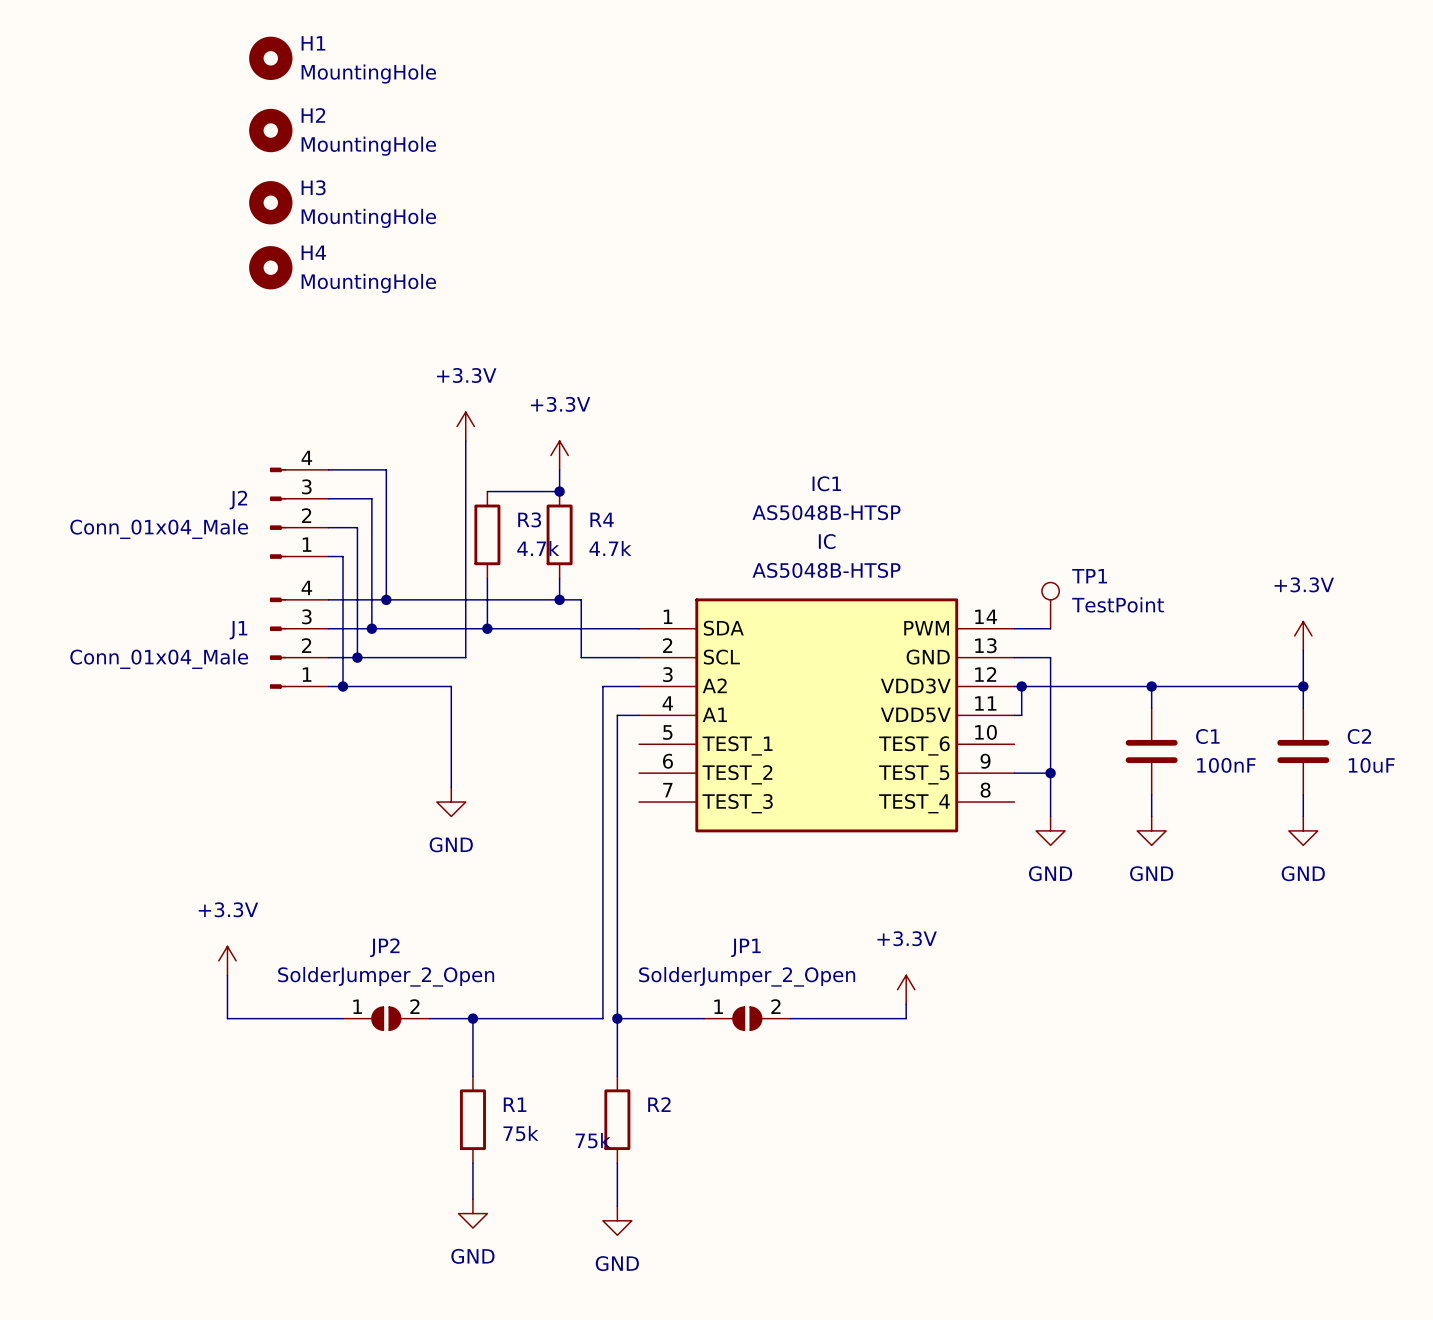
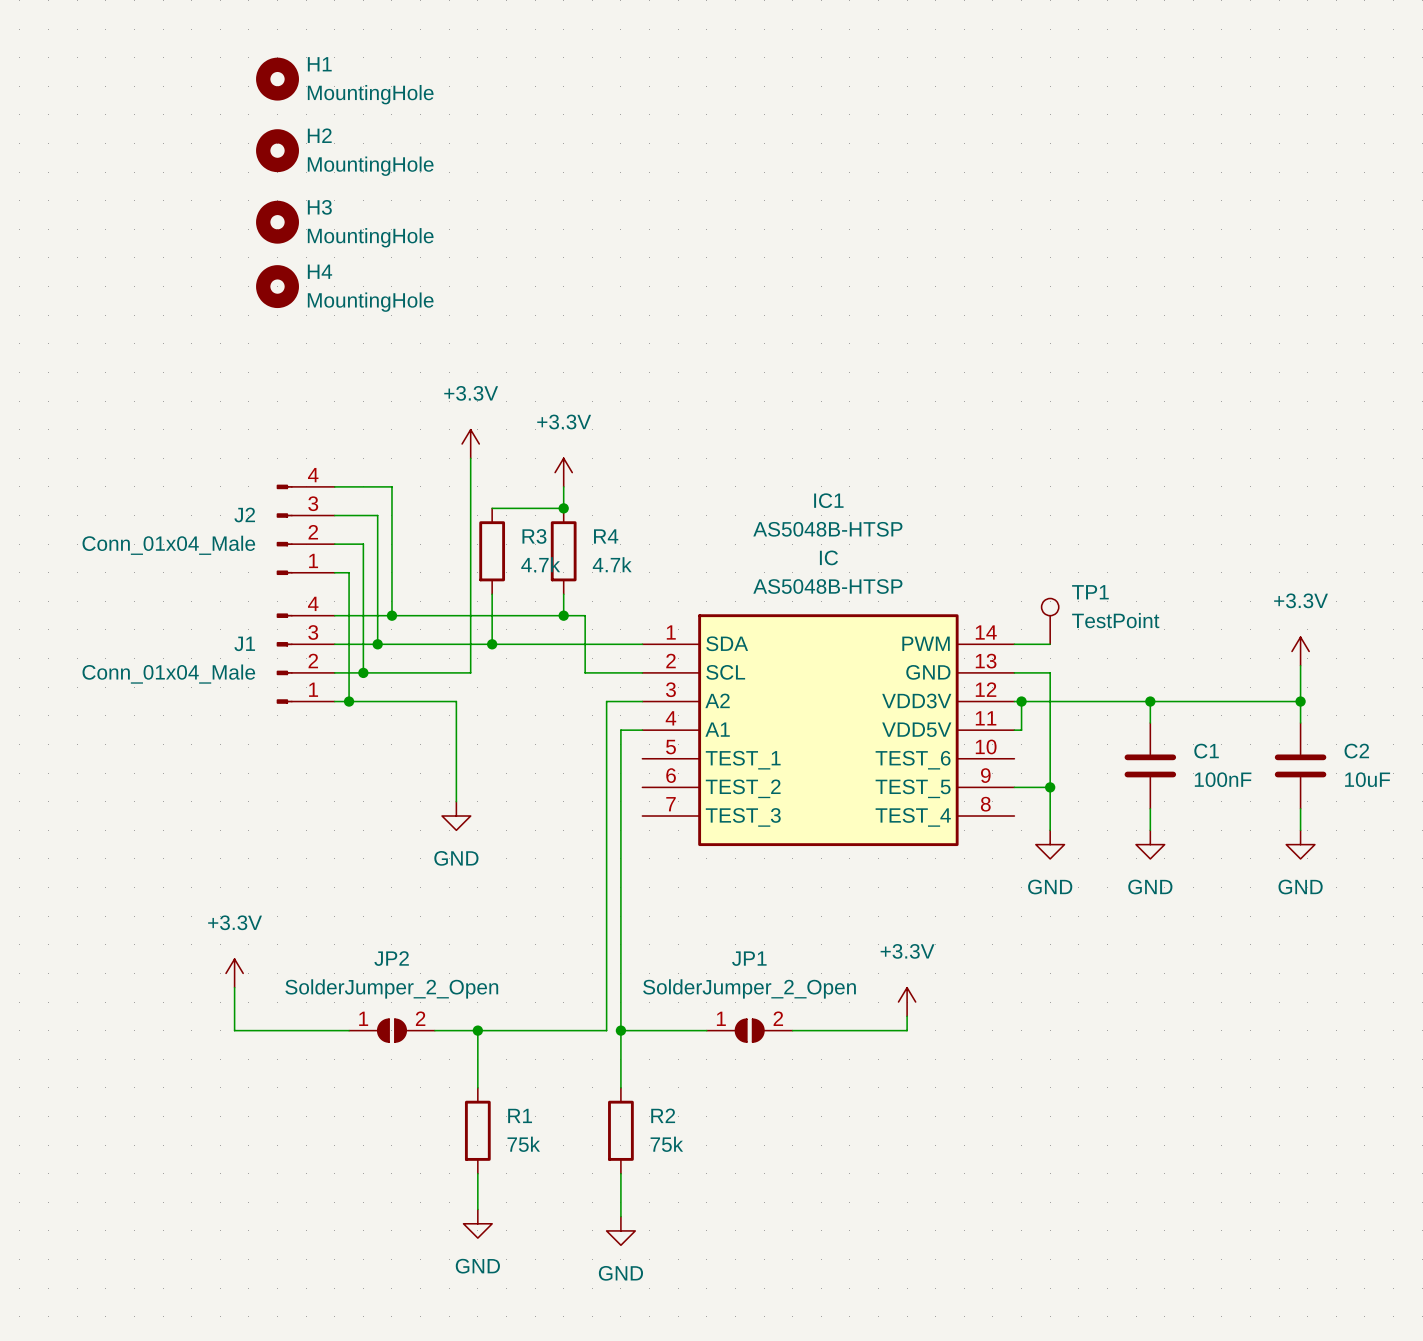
R2 value position: 75k (593, 1140) -> 75k (666, 1144)

